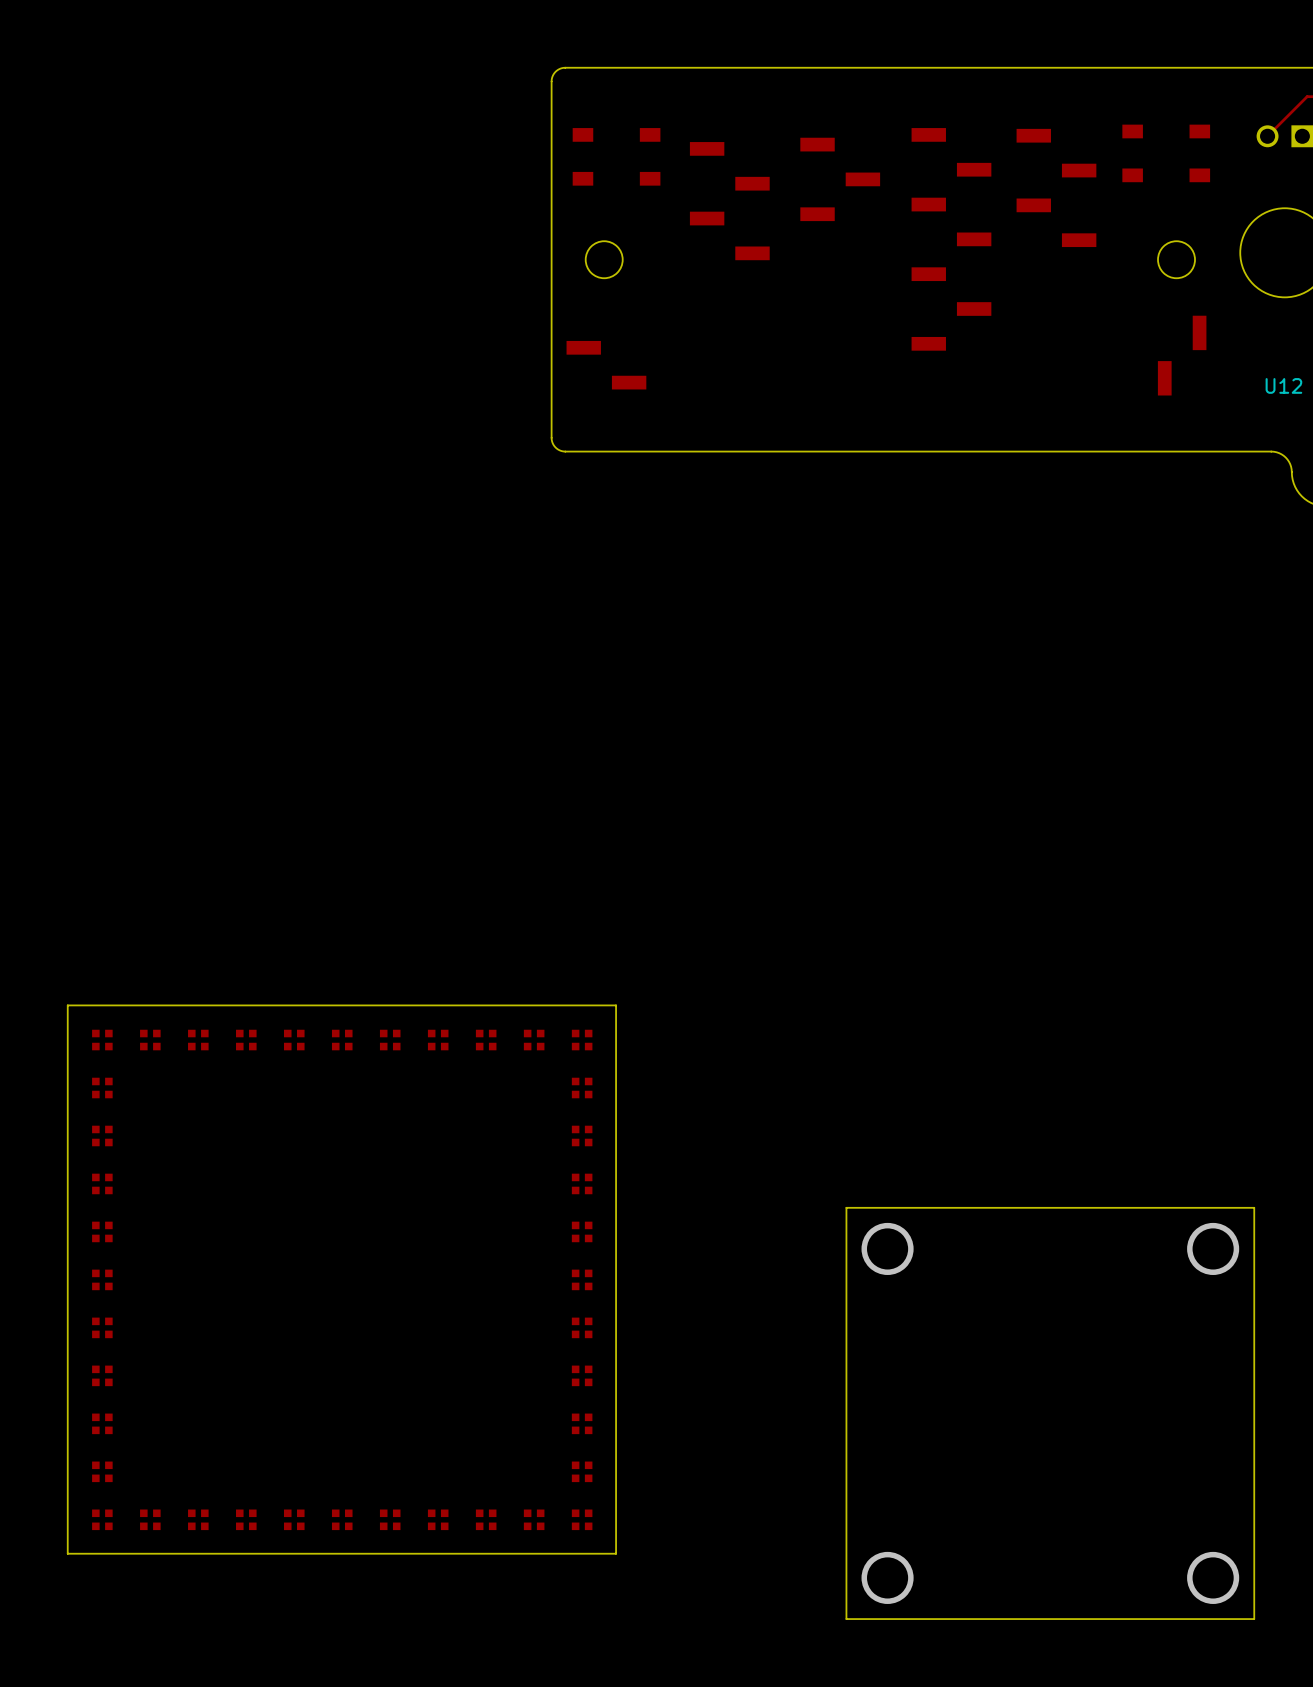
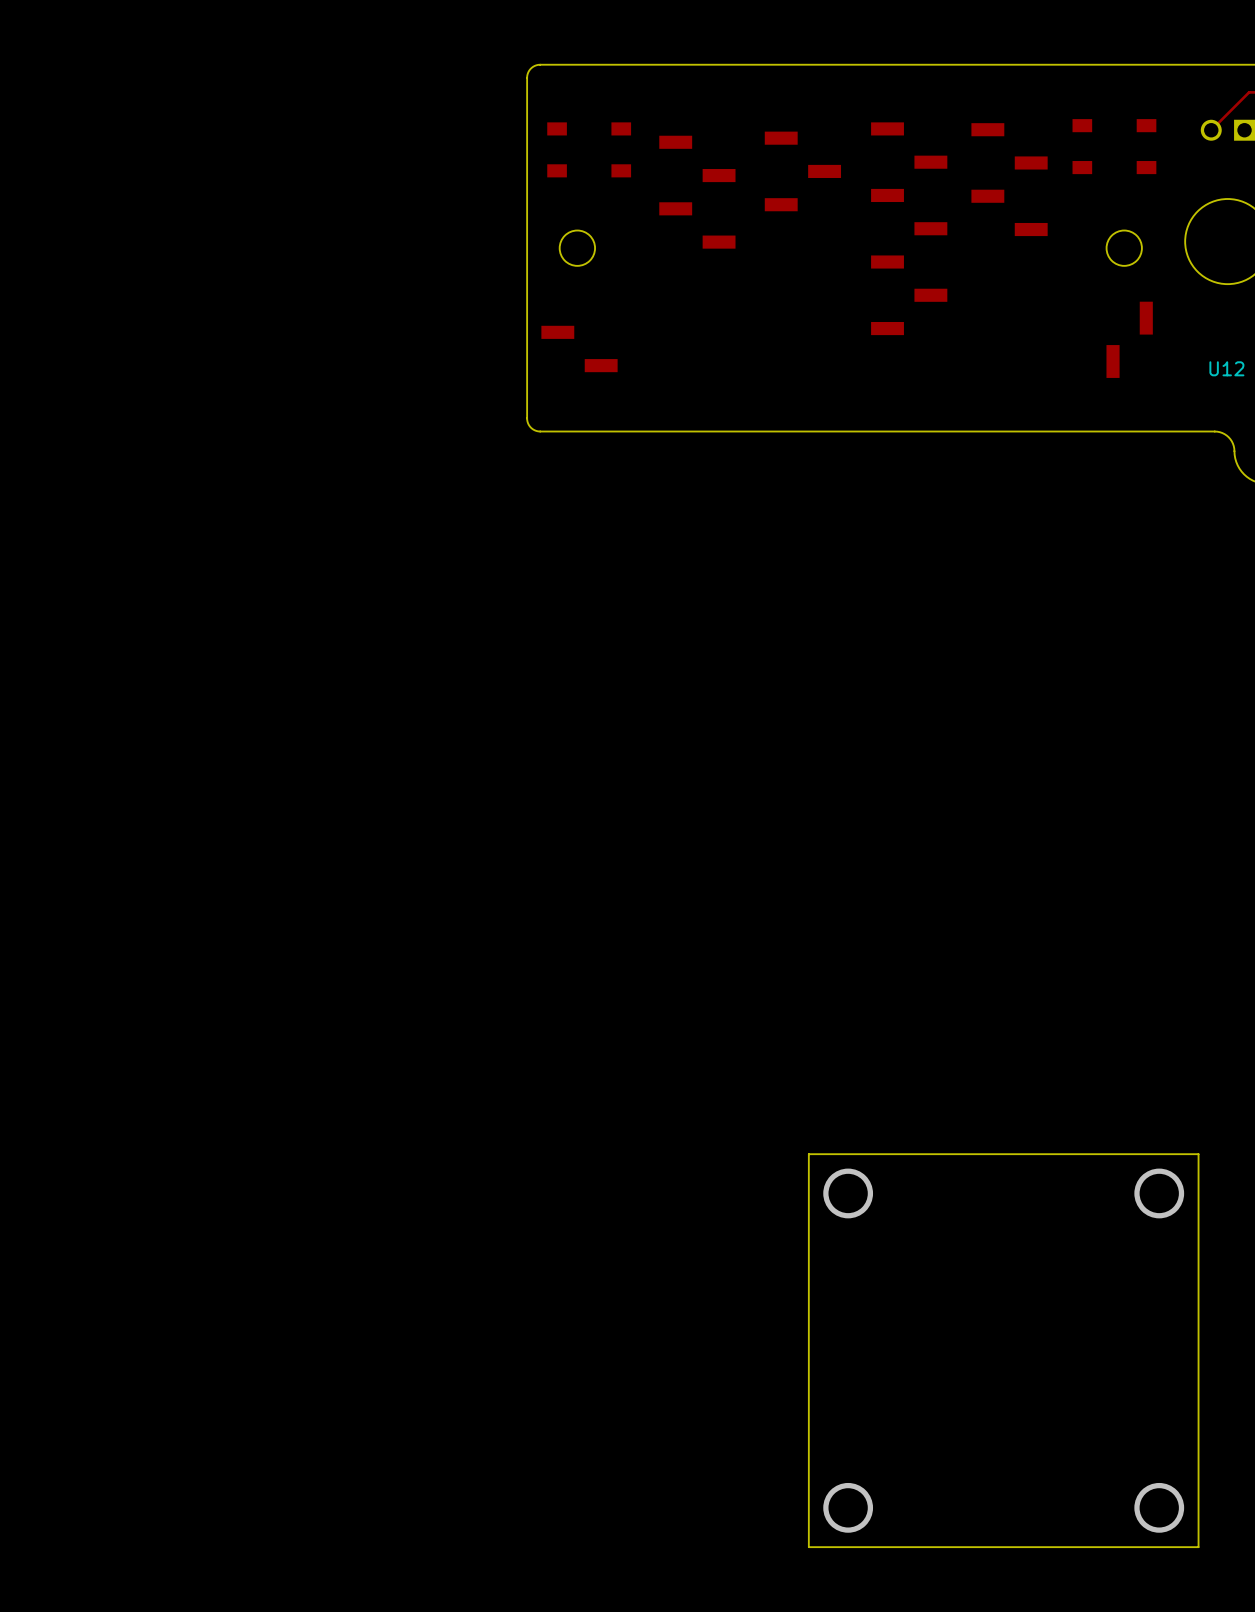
board edge: (616, 1005) (67, 1005) (67, 1553) (616, 1553) (616, 1005) -> none
part: (102, 1040) -> none
part: (150, 1040) -> none
part: (198, 1040) -> none
part: (246, 1040) -> none
part: (294, 1040) -> none
part: (342, 1040) -> none
part: (390, 1040) -> none
part: (438, 1040) -> none
part: (486, 1040) -> none
part: (534, 1040) -> none
part: (582, 1040) -> none
part: (102, 1088) -> none
part: (582, 1088) -> none
part: (102, 1135) -> none
part: (582, 1135) -> none
part: (102, 1183) -> none
part: (582, 1183) -> none
part: (102, 1231) -> none
part: (582, 1231) -> none
part: (102, 1279) -> none
part: (582, 1279) -> none
part: (102, 1327) -> none
part: (582, 1327) -> none
part: (102, 1375) -> none
part: (582, 1375) -> none
part: (102, 1423) -> none
part: (582, 1423) -> none
part: (102, 1471) -> none
part: (582, 1471) -> none
part: (102, 1519) -> none
part: (150, 1519) -> none
part: (198, 1519) -> none
part: (246, 1519) -> none
part: (294, 1519) -> none
part: (342, 1519) -> none
part: (390, 1519) -> none
part: (438, 1519) -> none
part: (486, 1519) -> none
part: (534, 1519) -> none
part: (582, 1519) -> none

